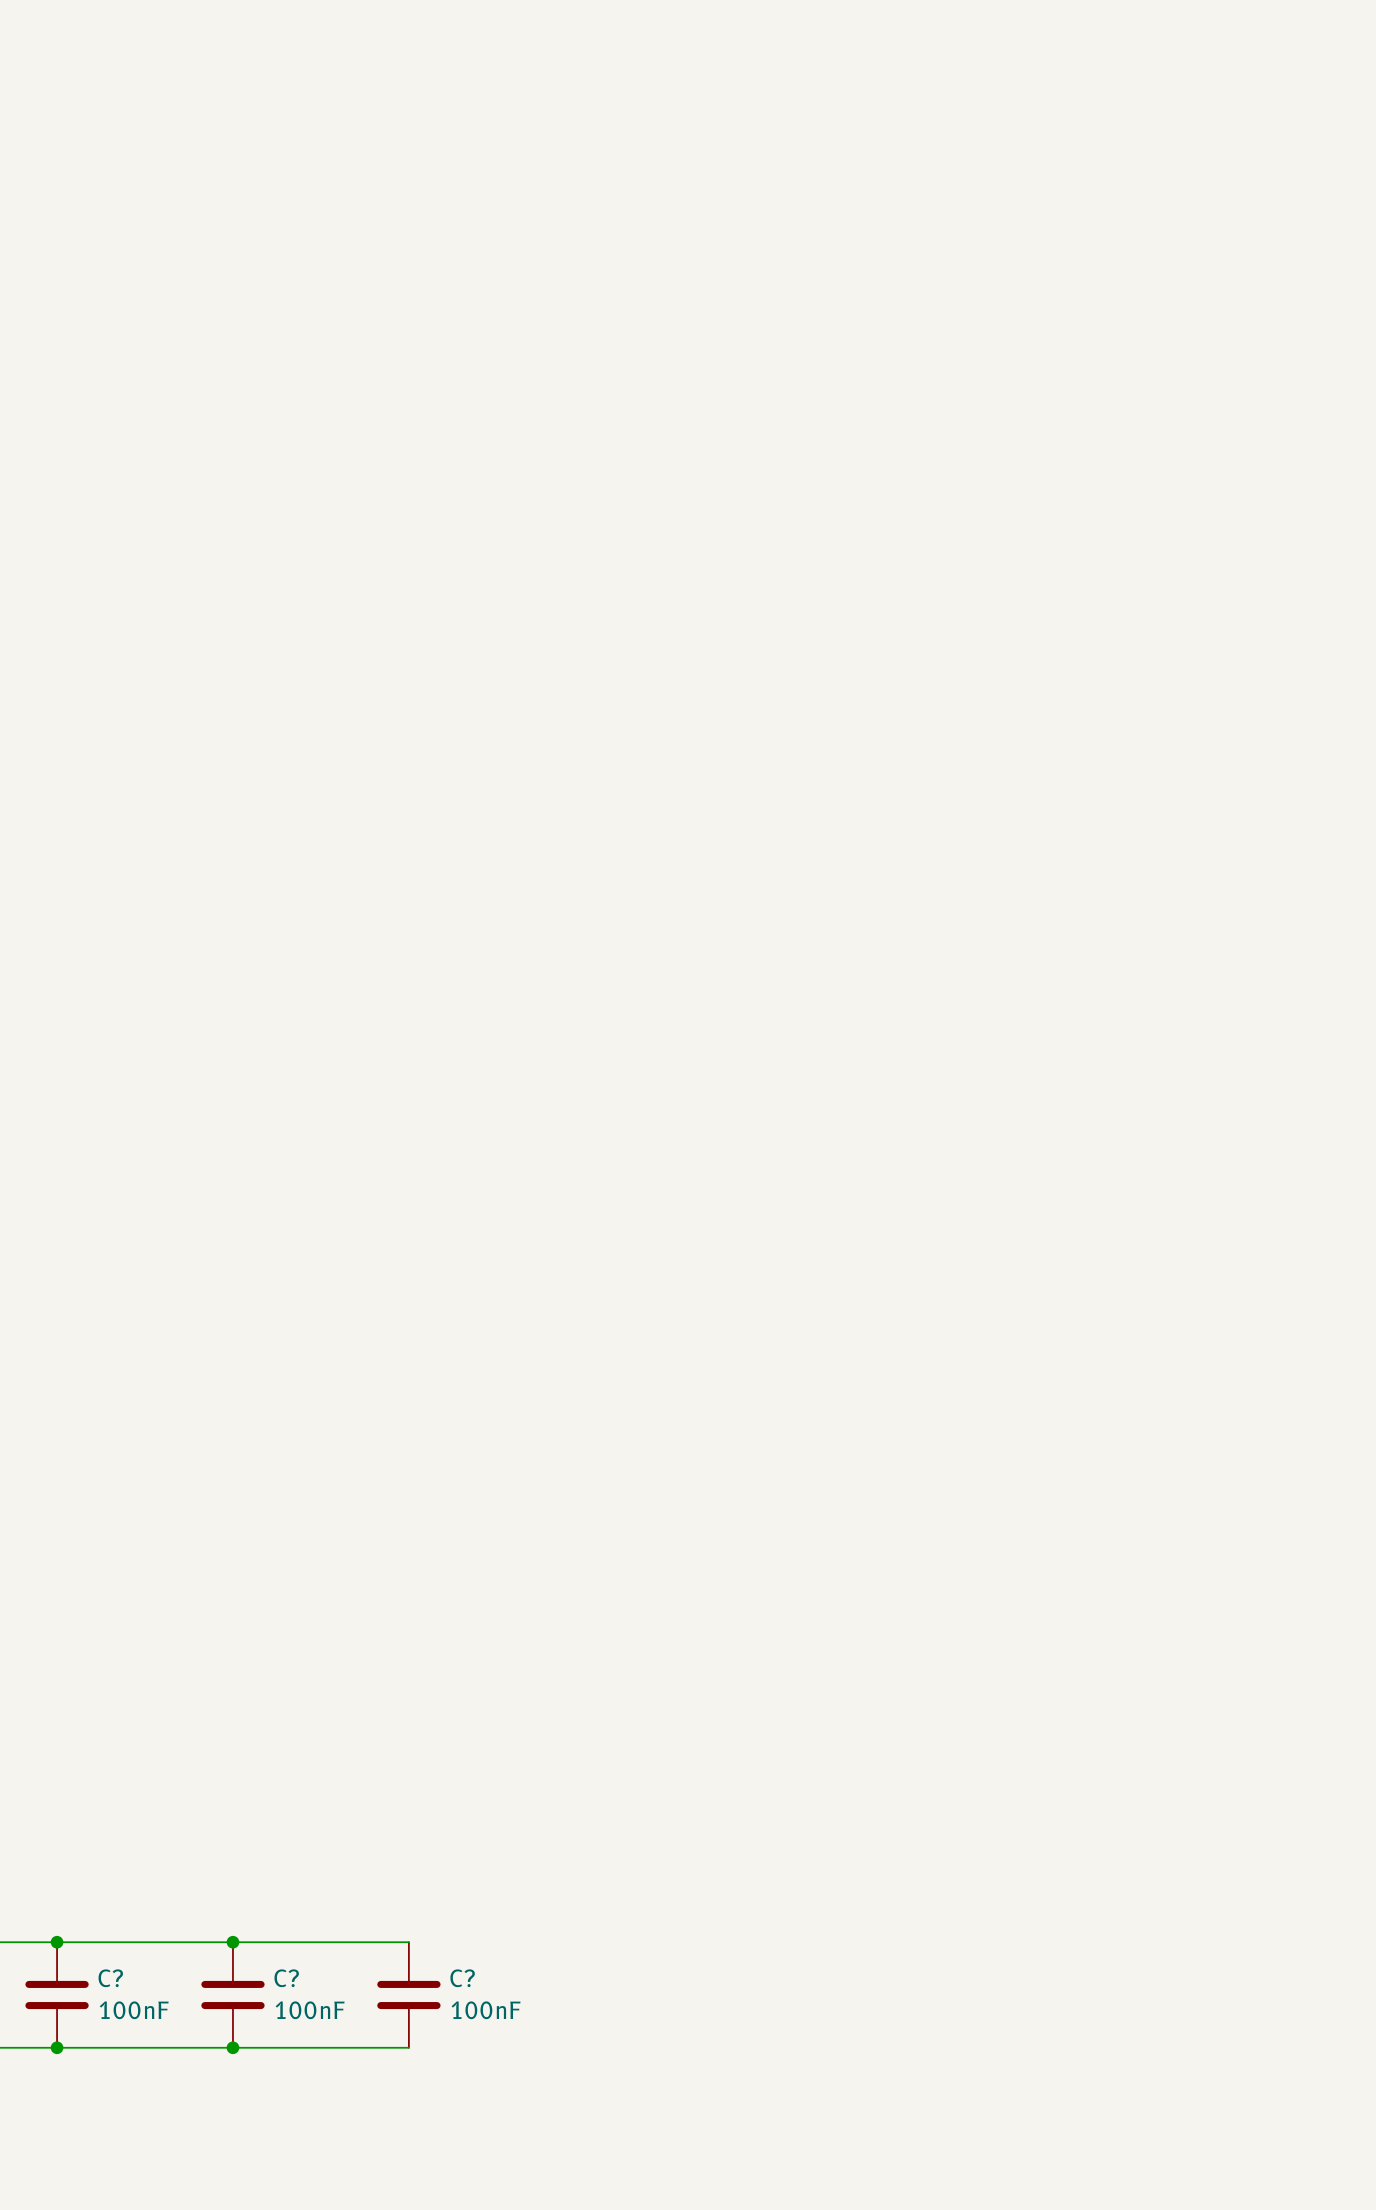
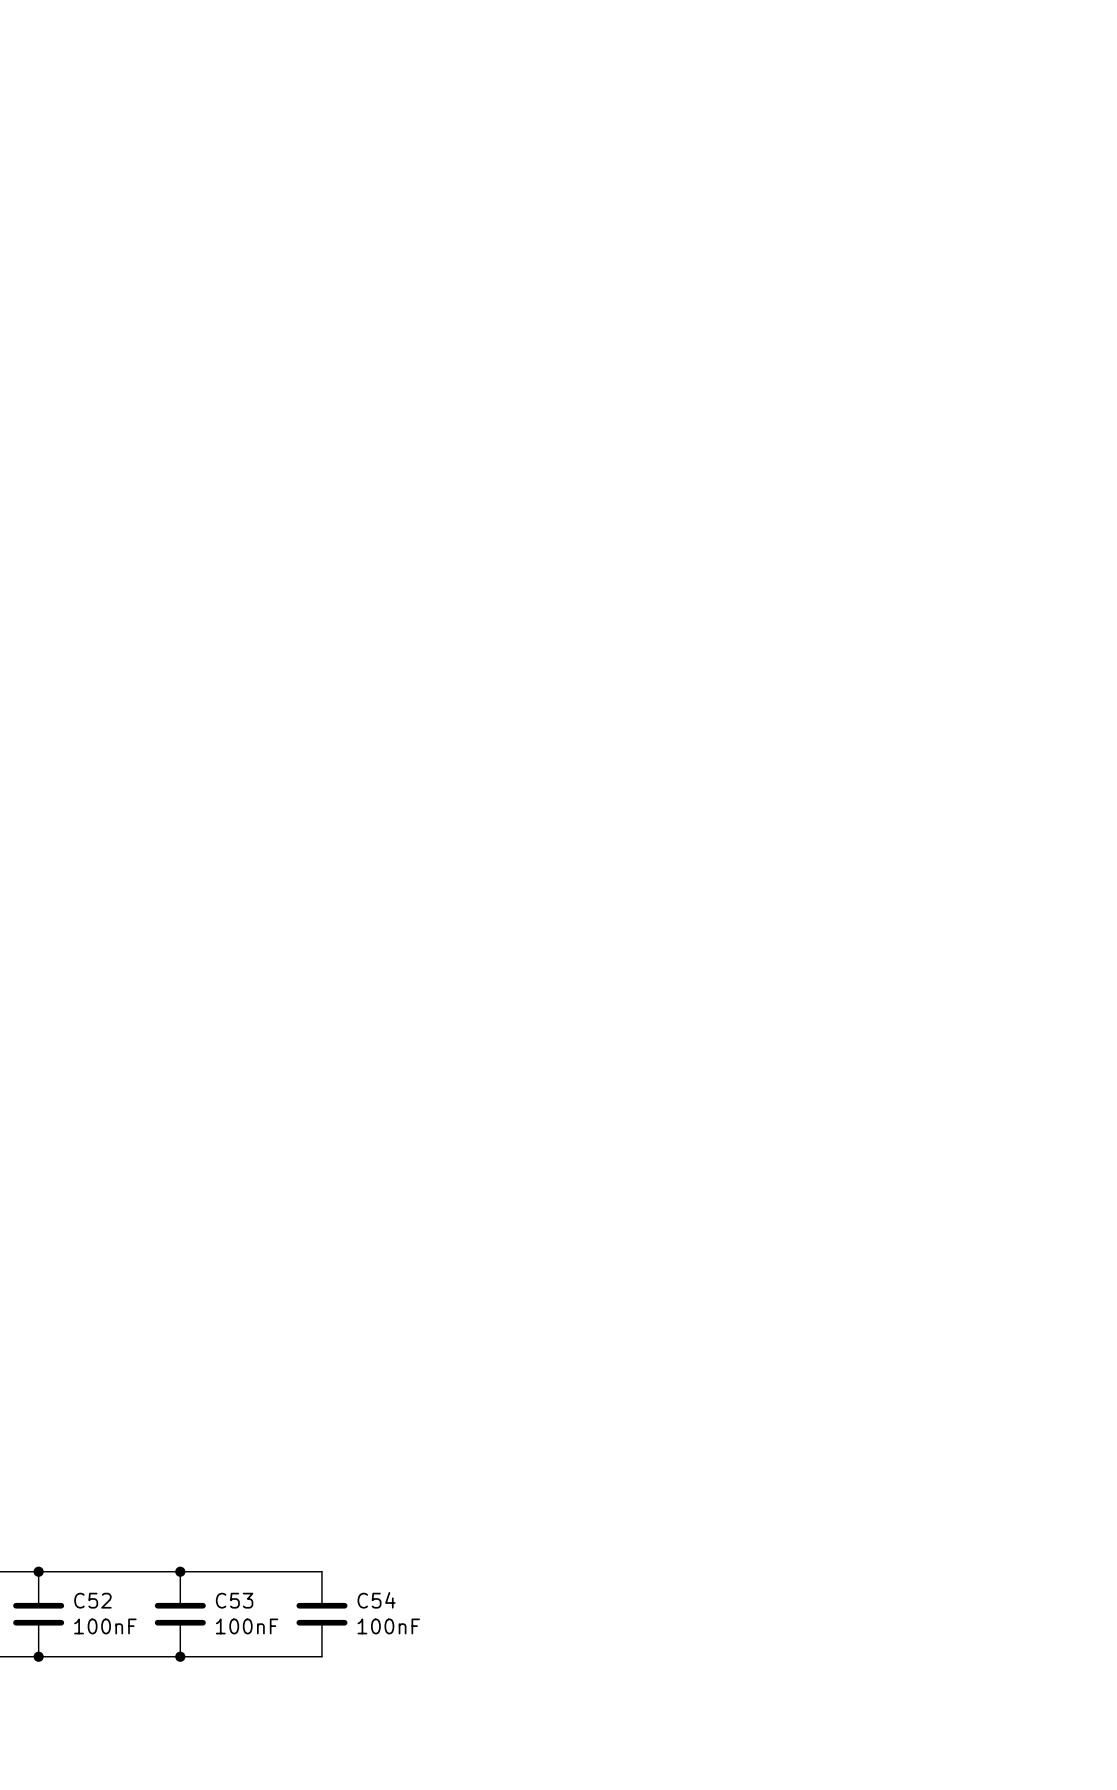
C? name: C? (110, 1978) -> C52 (92, 1600)
C? name: C? (286, 1978) -> C53 (234, 1600)
C? name: C? (462, 1978) -> C54 (376, 1600)

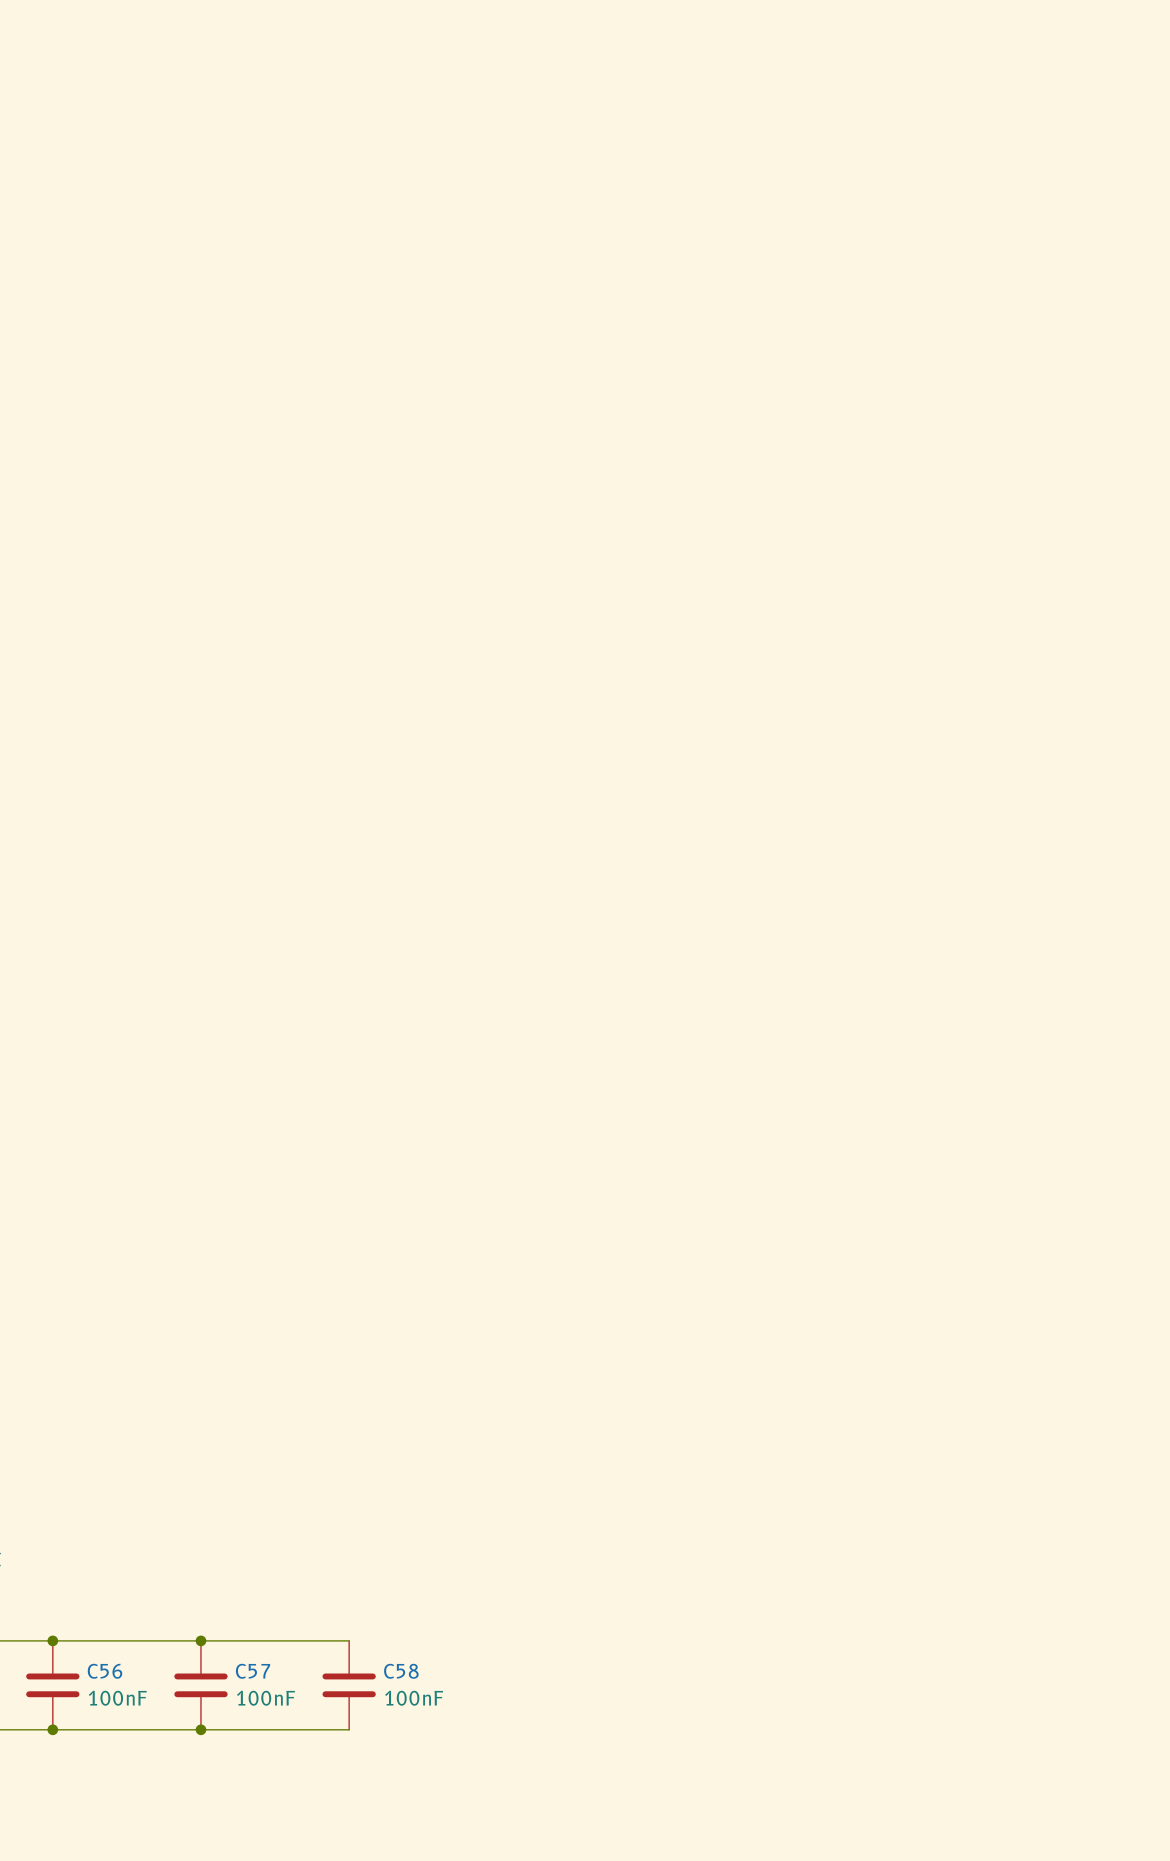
C52 name: C52 (92, 1600) -> C56 (105, 1671)
C53 name: C53 (234, 1600) -> C57 (253, 1671)
C54 name: C54 (376, 1600) -> C58 (401, 1671)

